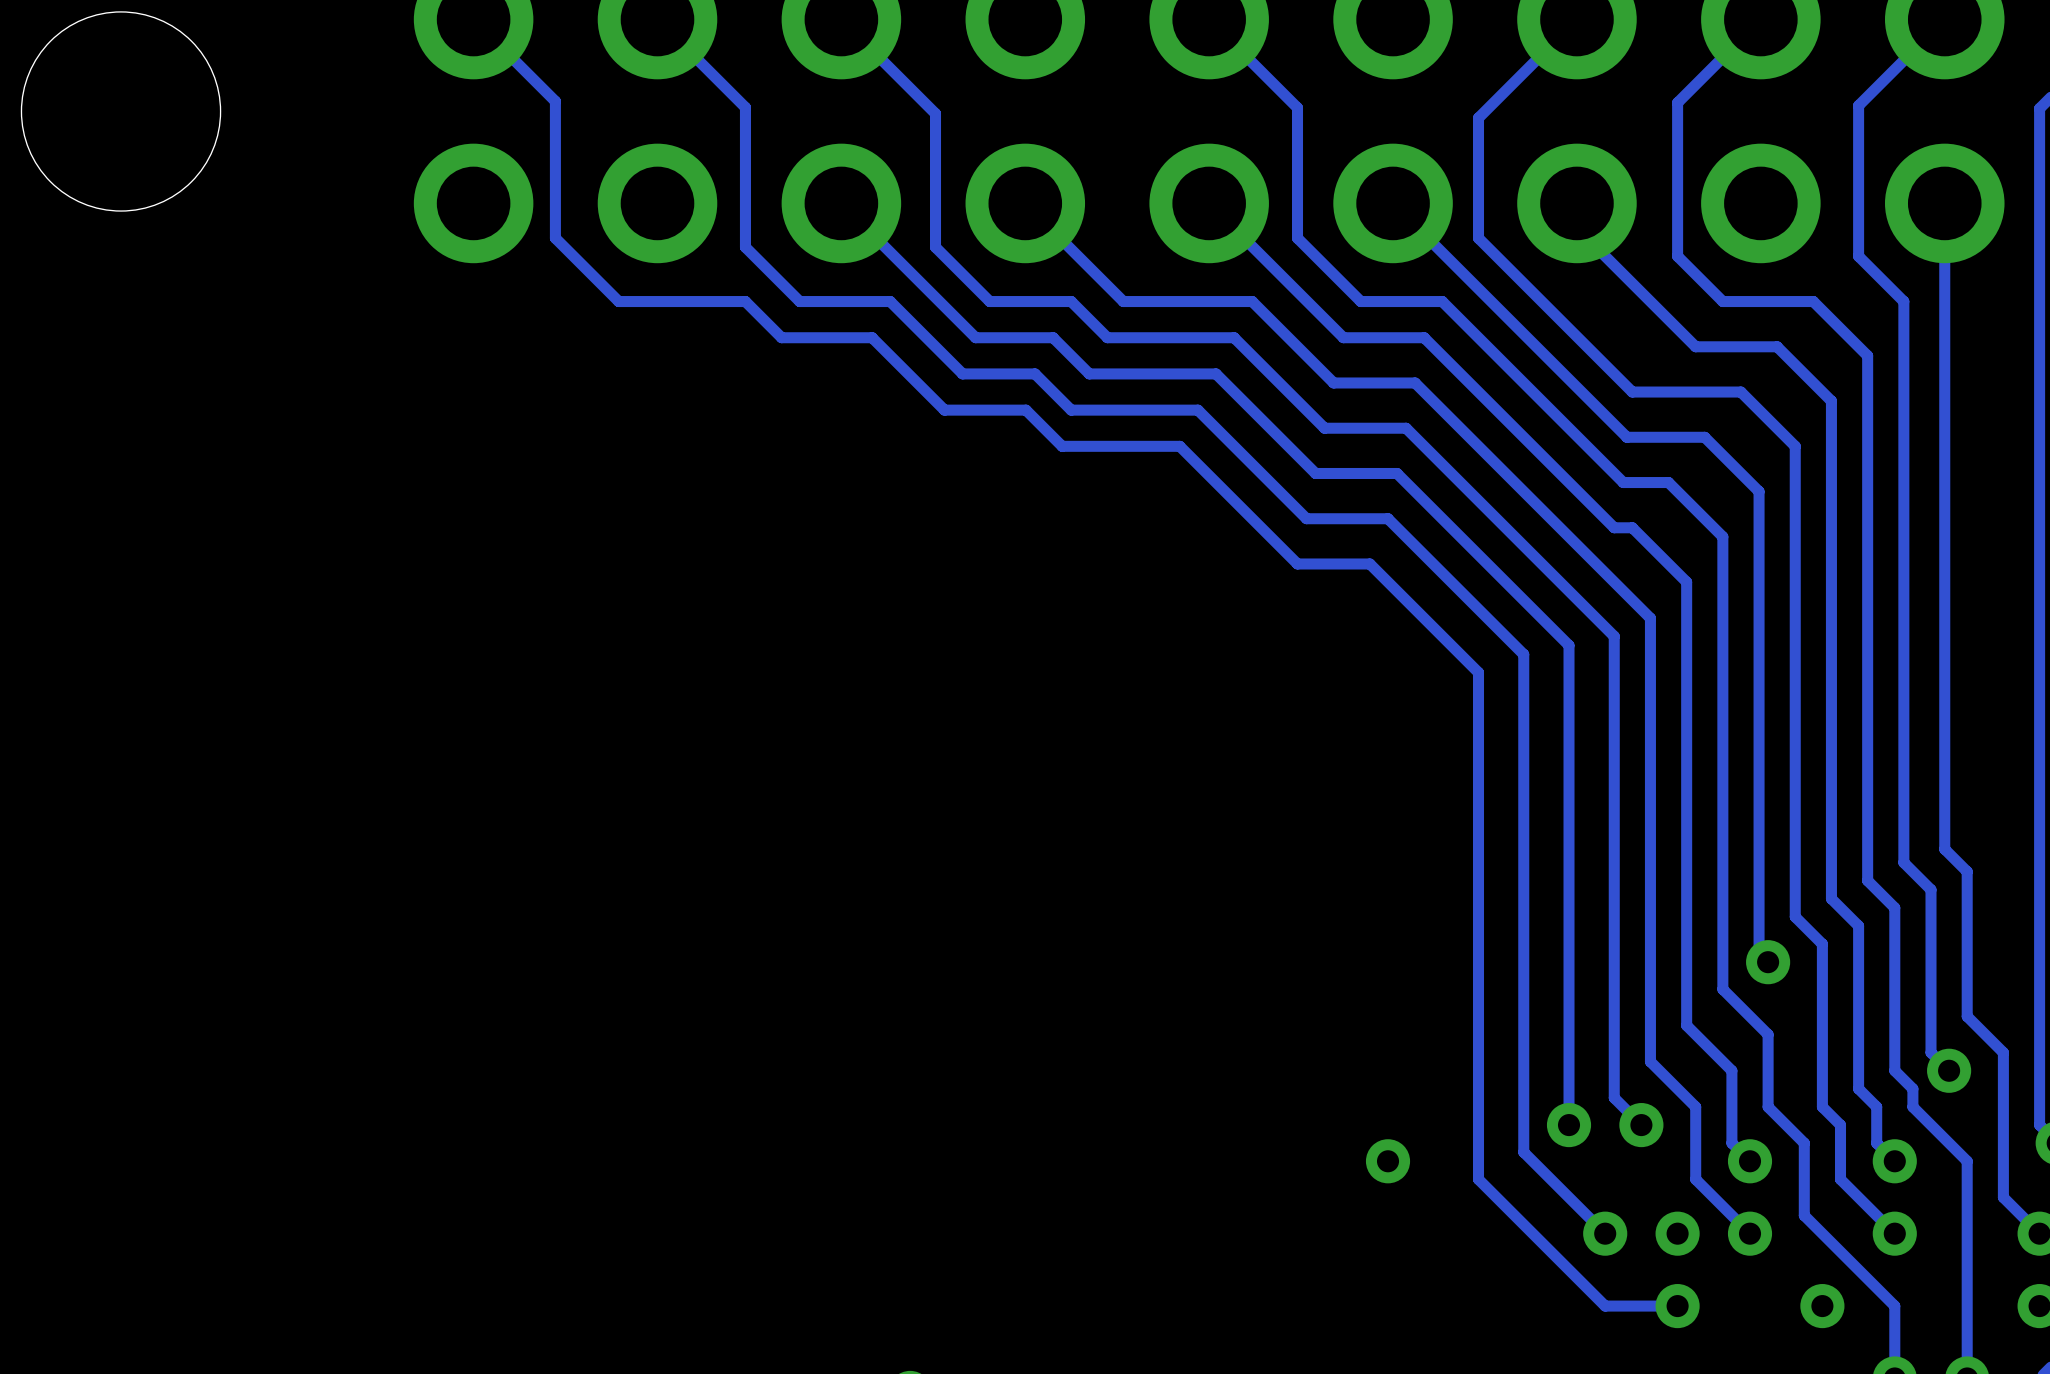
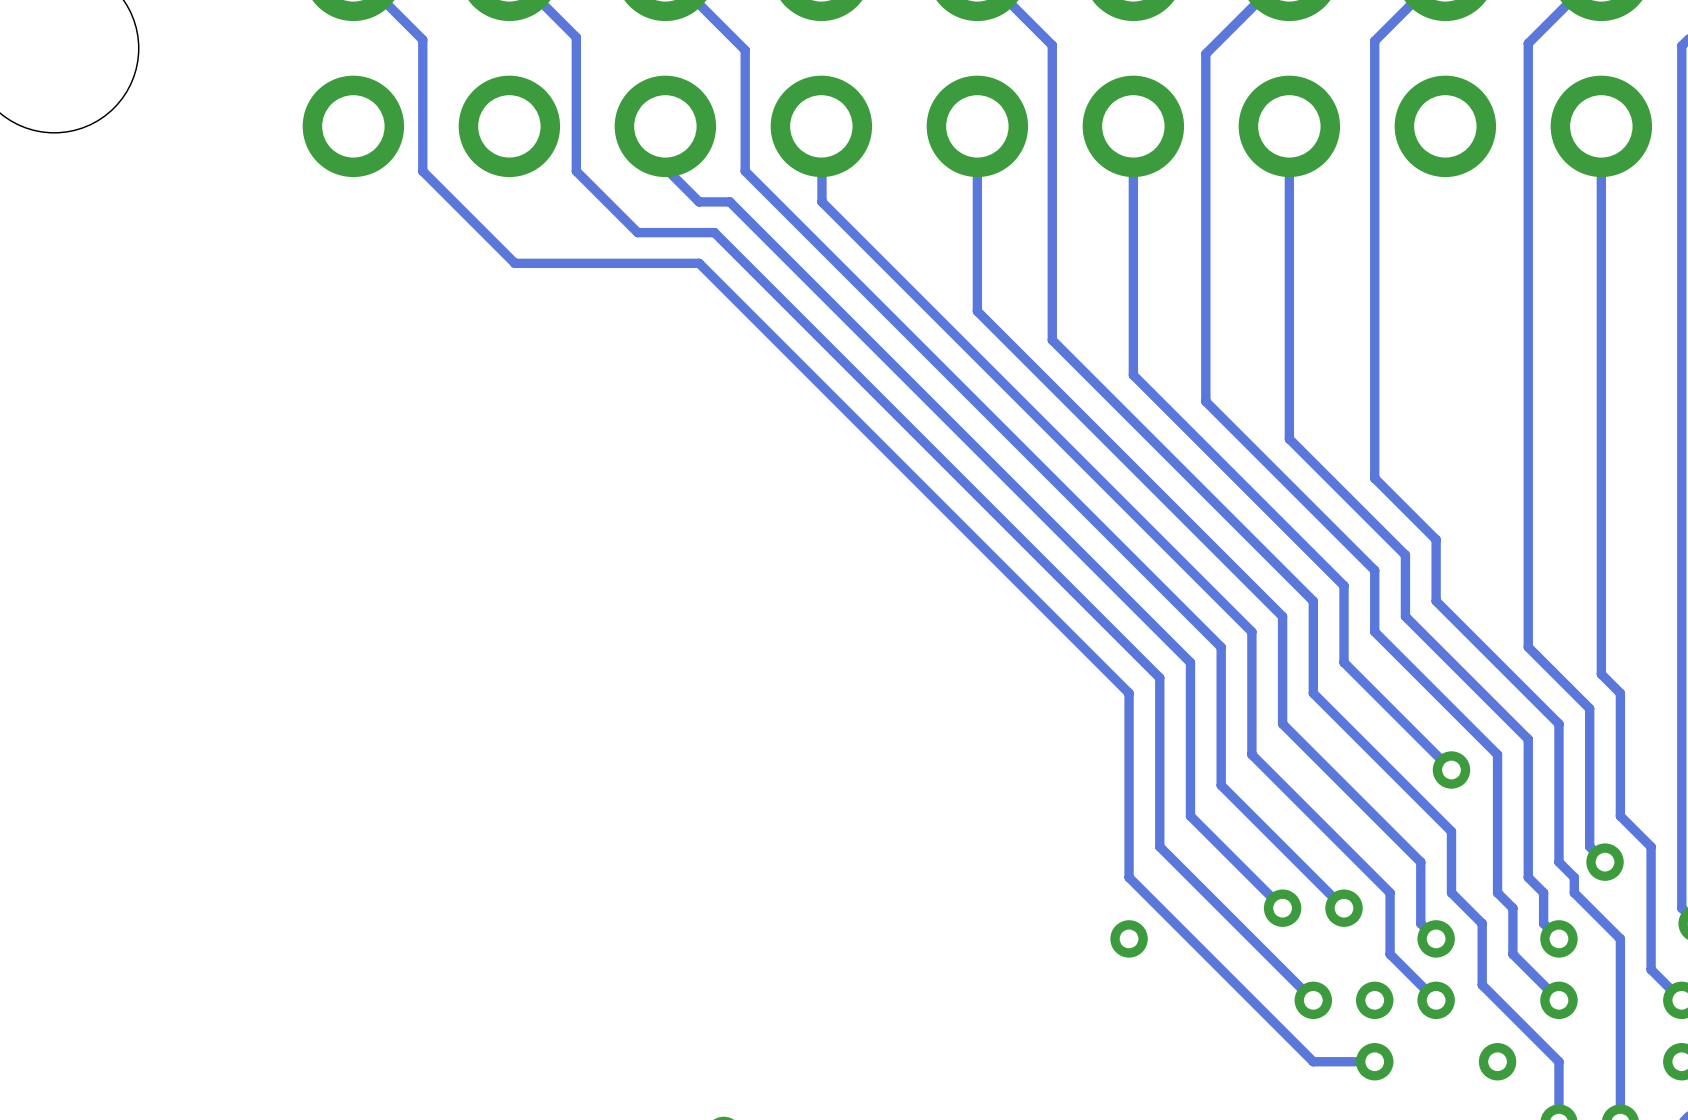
track: (736, 98) (745, 107) (745, 247) (799, 301) (890, 301) (962, 373) (1035, 373) (1071, 410) (1197, 410) (1209, 421) -> (977, 126) (977, 311)
track: (841, 203) (975, 337) (1053, 337) (1089, 373) (1216, 373) (1297, 455) -> (1052, 155) (1052, 340)
track: none -> (665, 126) (665, 168) (699, 201) (729, 201) (1190, 662) (1190, 816) (1282, 908)
track: (1209, 203) (1343, 337) (1424, 337) (1614, 527) (1632, 527) (1686, 582) (1686, 1025) -> none
track: (1393, 203) (1626, 437) (1704, 437) (1759, 491) (1759, 953) -> (1133, 126) (1133, 375) (1344, 585) (1344, 662) (1443, 762)
track: (1026, 204) (1123, 301) (1252, 301) (1333, 382) (1415, 382) (1650, 618) (1650, 1061) -> none
track: (1576, 228) (1695, 346) (1777, 346) (1831, 401) (1831, 898) -> (1289, 147) (1289, 438) (1405, 555) (1405, 616) (1505, 716)
track: (555, 238) (618, 301) (745, 301) (781, 337) (872, 337) (944, 410) (1026, 410) (1062, 446) (1179, 446) -> (821, 126) (821, 201) (952, 332)
track: none -> (422, 155) (422, 171) (514, 263) (699, 263) (1129, 693) (1129, 877) (1205, 954)
track: (1297, 238) (1360, 301) (1442, 301) (1623, 482) (1668, 482) (1722, 536) (1722, 989) -> (1067, 355) (1313, 601) (1313, 693) (1413, 793)
track: (1478, 238) (1632, 392) (1740, 392) (1795, 446) (1795, 916) -> (1205, 155) (1205, 401) (1374, 570) (1374, 631) (1474, 731)
track: (935, 247) (989, 301) (1071, 301) (1107, 337) (1234, 337) (1324, 428) (1406, 428) (1614, 636) (1614, 1097) -> (745, 163) (745, 171) (1221, 647) (1221, 785) (1320, 885)
track: (1677, 256) (1722, 301) (1813, 301) (1867, 355) (1867, 880) -> (1374, 171) (1374, 478) (1436, 539) (1436, 601) (1535, 700)
track: (1858, 256) (1903, 301) (1903, 862) -> (1528, 171) (1528, 647) (1566, 685)
track: (1315, 473) (1397, 473) (1569, 645) (1569, 781) -> (1059, 393) (1282, 616)
track: (1306, 518) (1388, 518) (1523, 654) (1523, 1152) -> (576, 37) (576, 171) (637, 232) (714, 232) (1159, 677) (1159, 846) (1244, 931)
track: (1297, 563) (1369, 563) (1478, 672) (1478, 1179) -> (1052, 432) (1251, 631) (1251, 754) (1351, 854)
track: (1569, 907) (1569, 1125) -> (1282, 723) (1382, 823)

